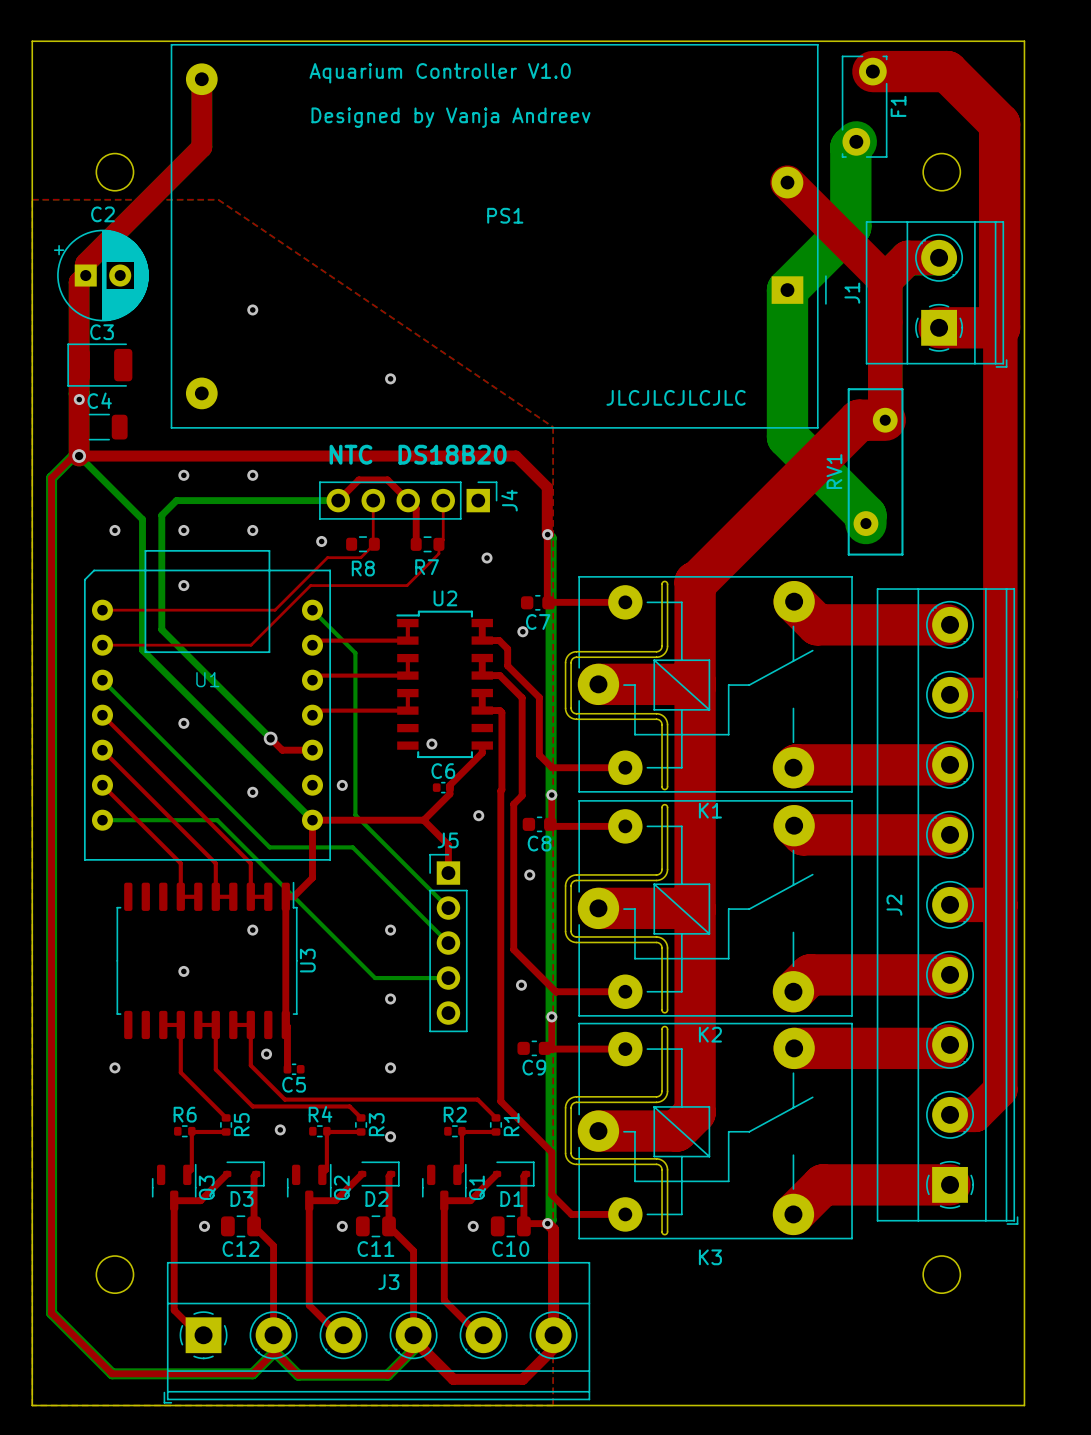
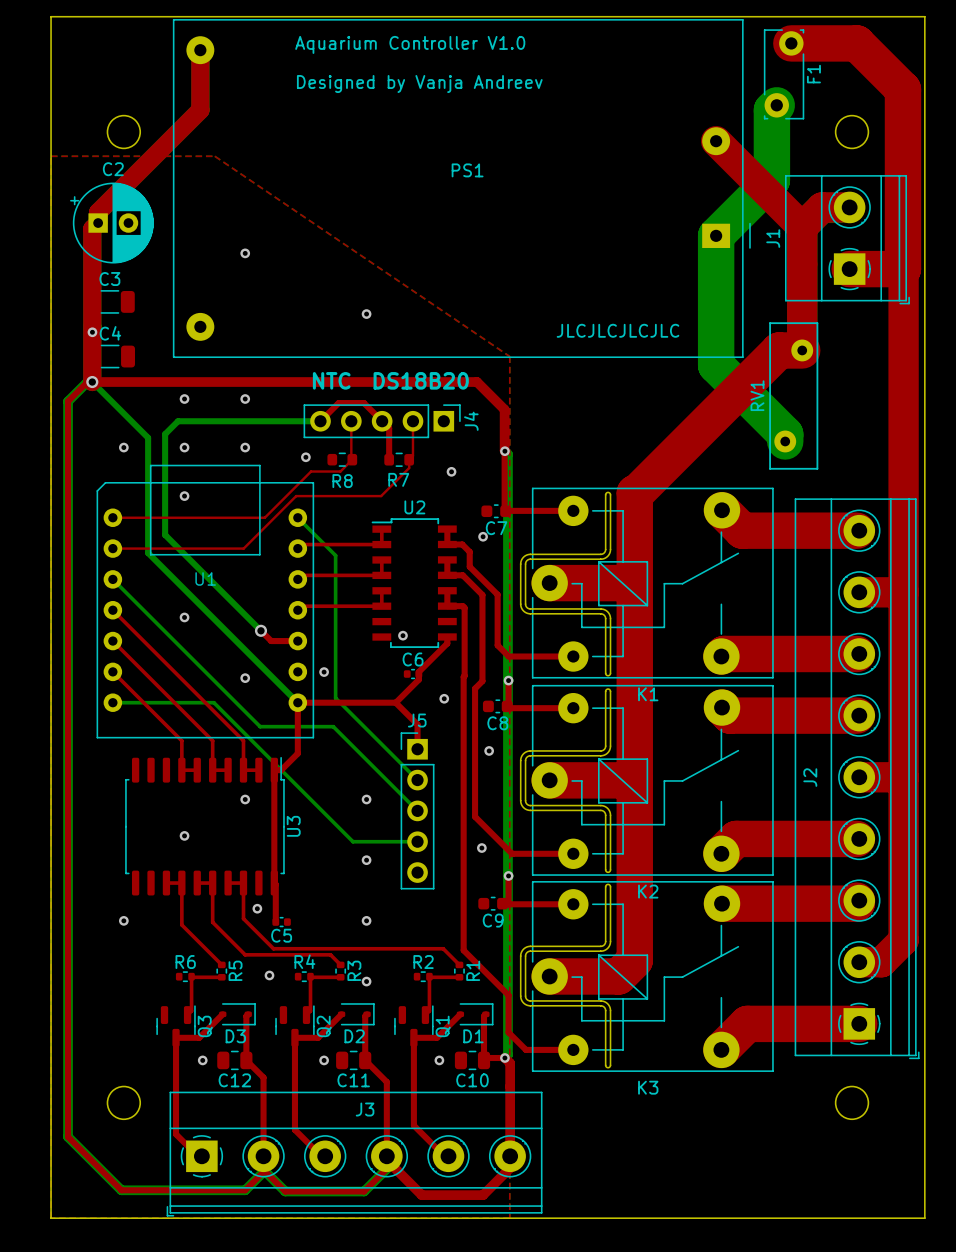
C3 footprint: [67, 343, 133, 387] -> [85, 290, 135, 314]

